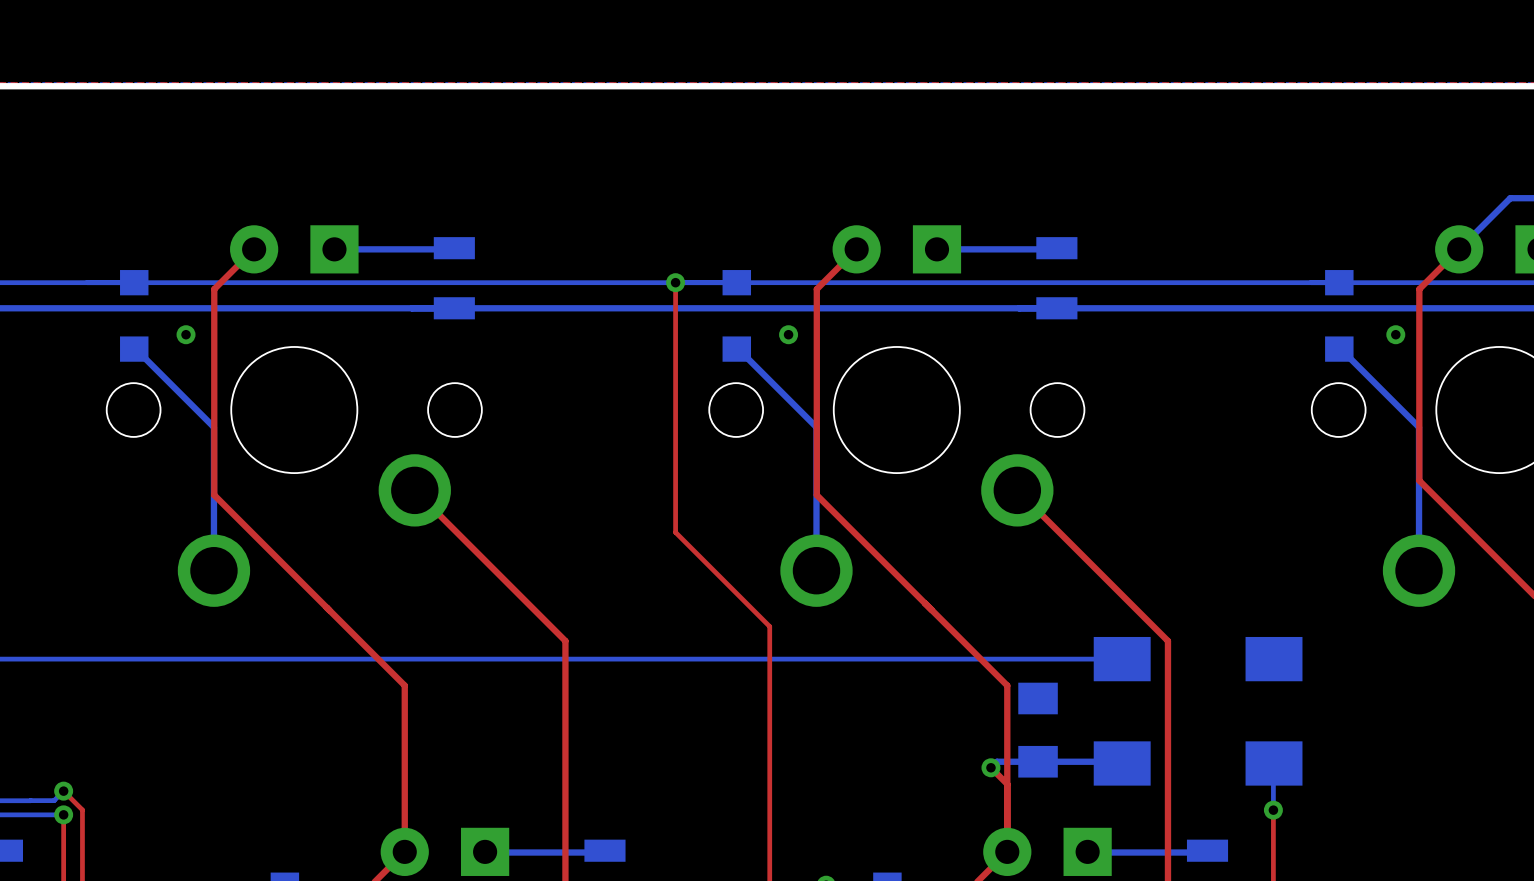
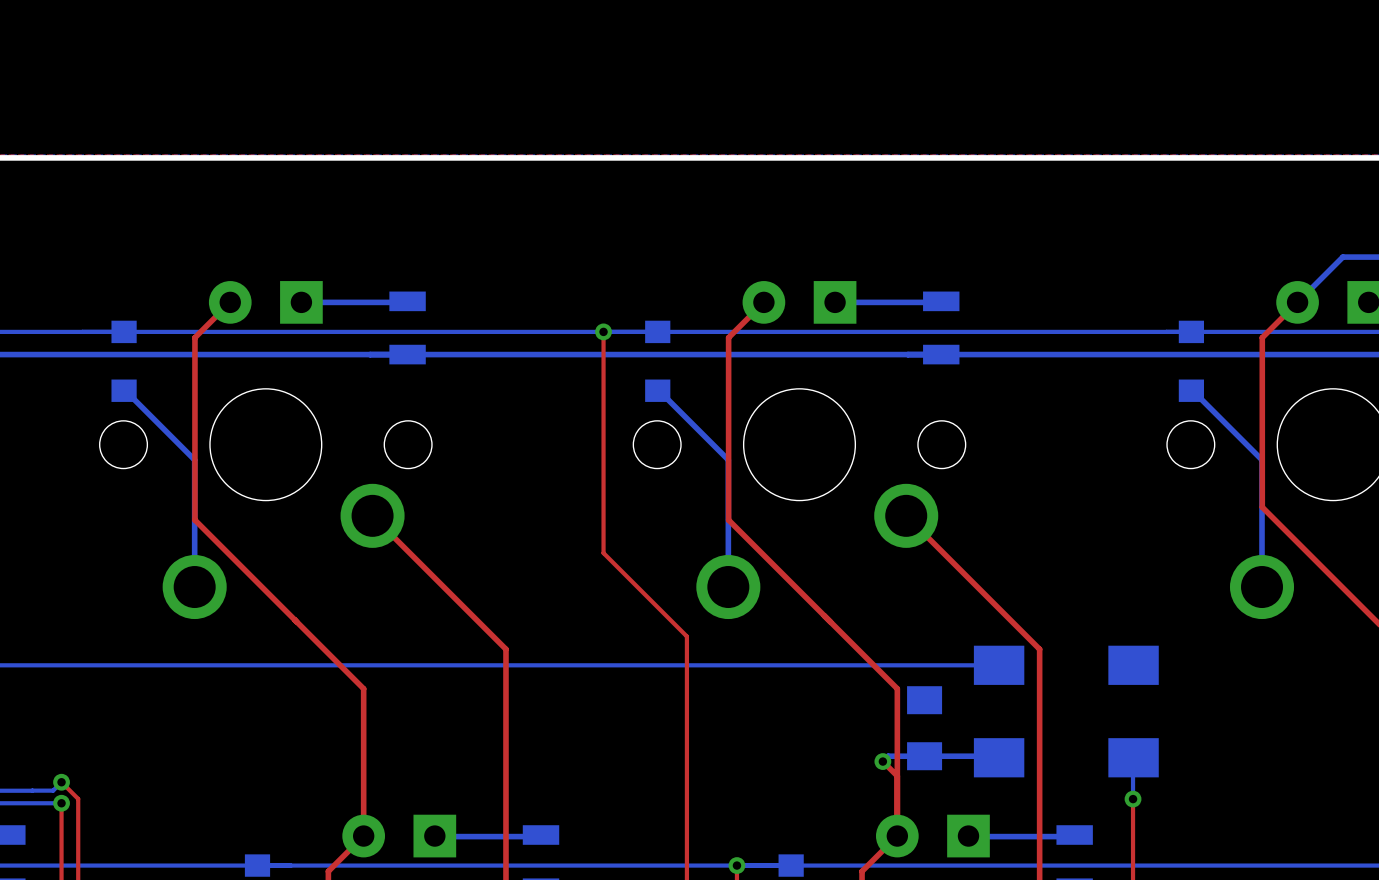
via: (186, 334) -> none
via: (788, 334) -> none
via: (1395, 334) -> none

